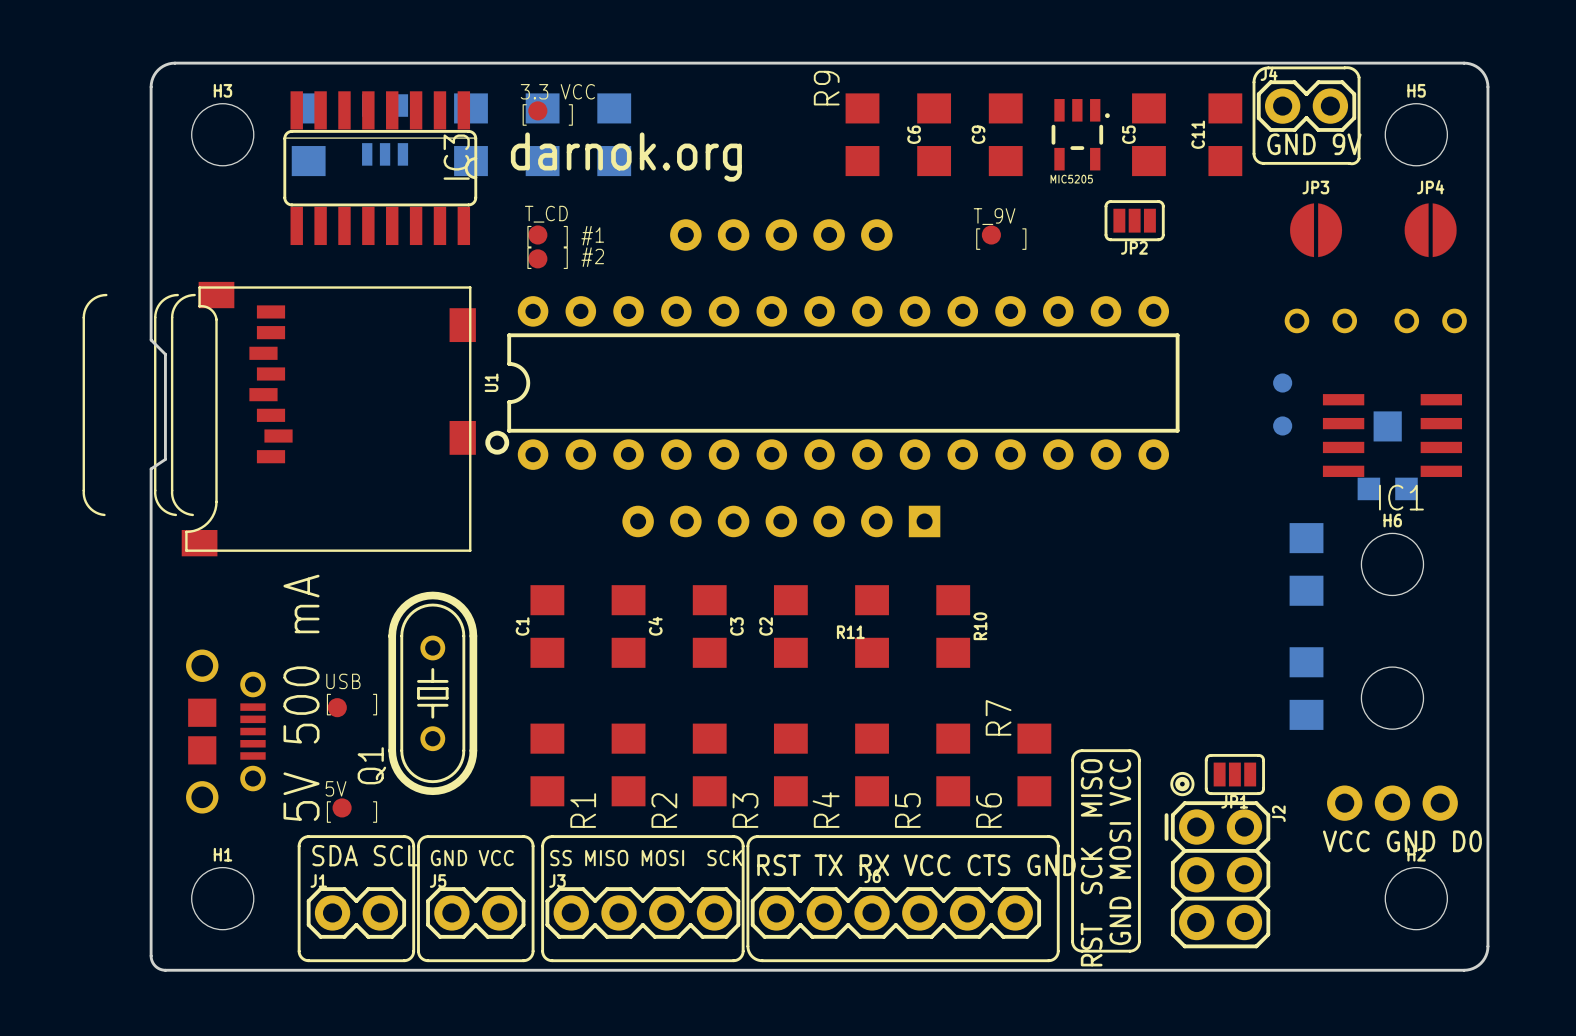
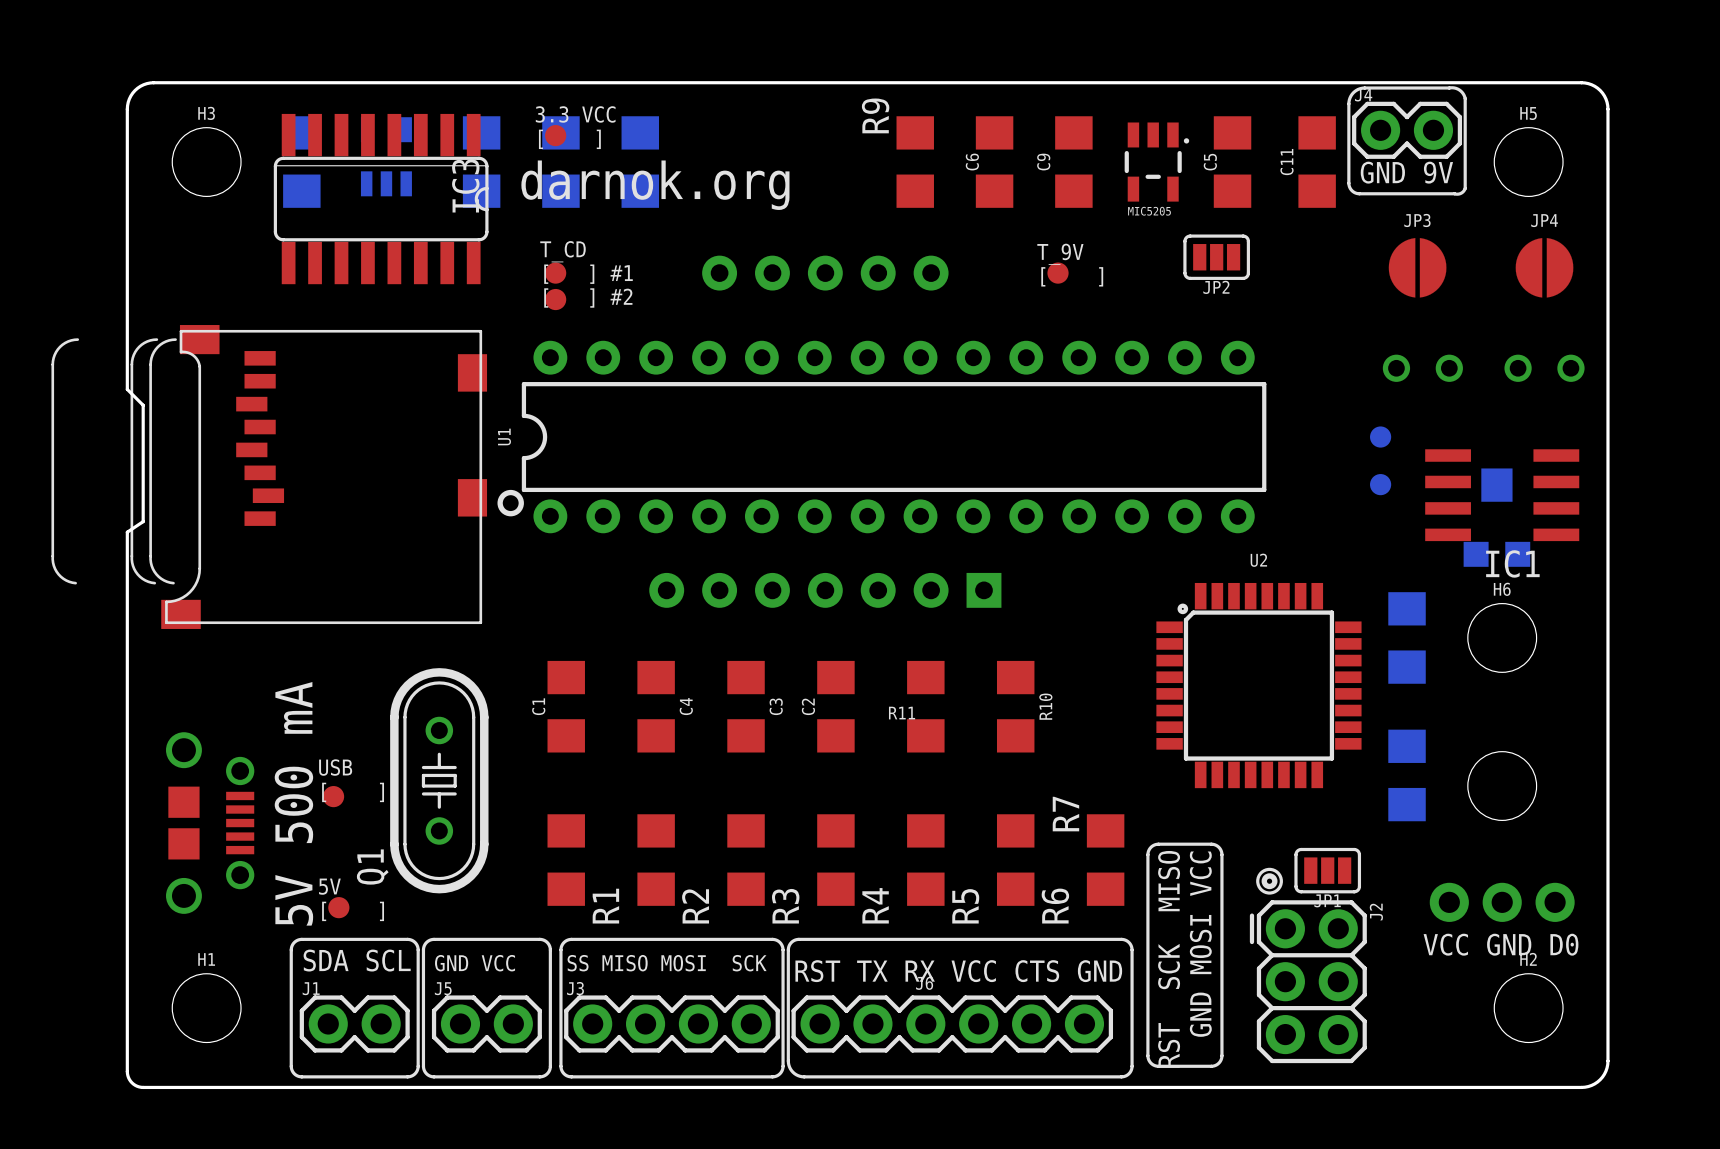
U2: none -> (1258, 685)

